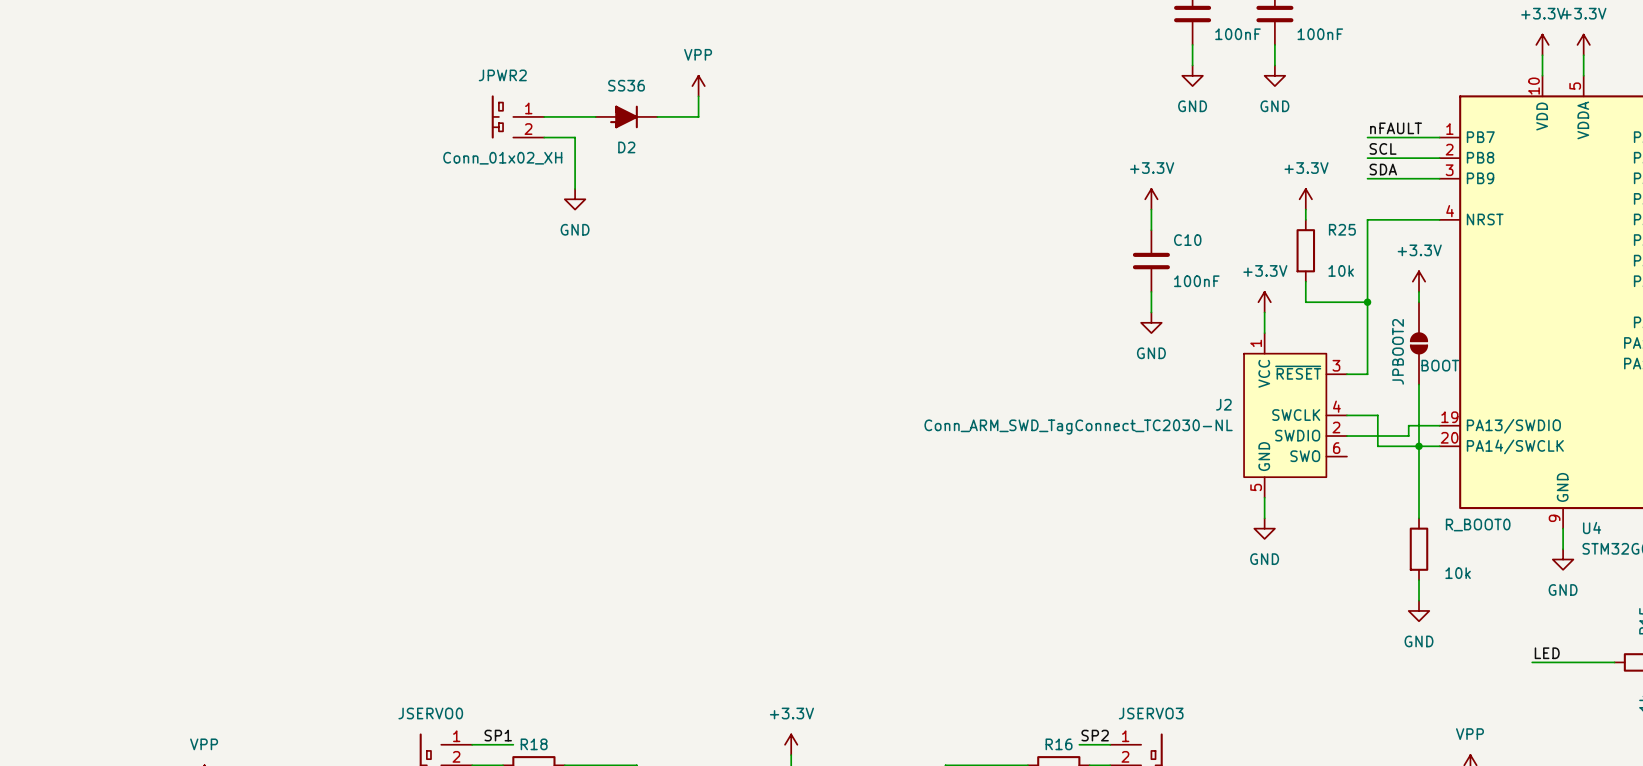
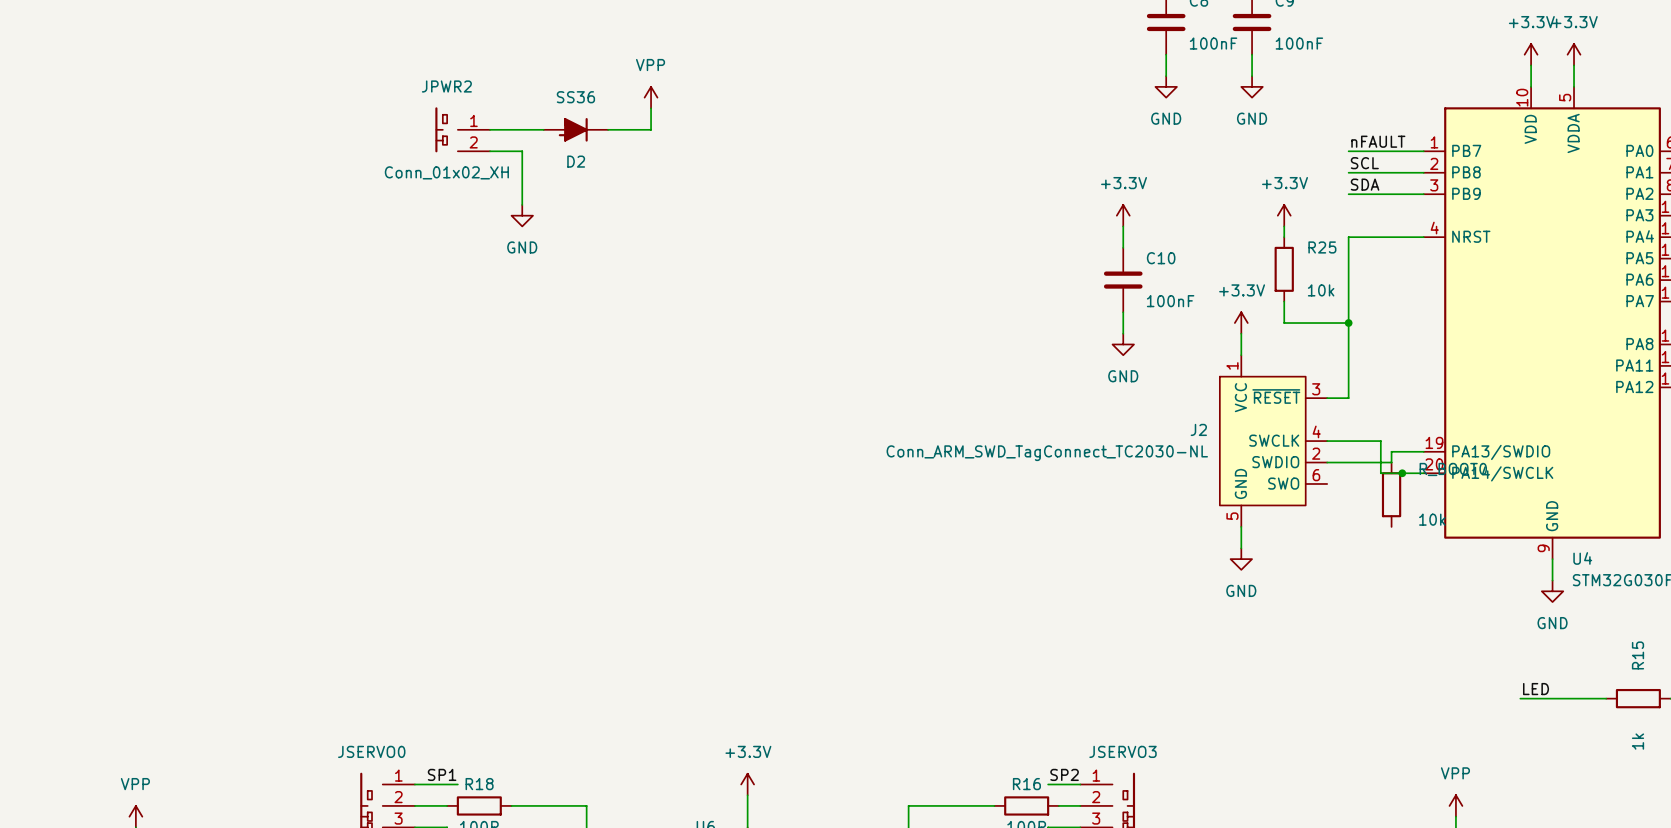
power symbol: +3.3V (1419, 281) -> none
wire: (1419, 291) (1419, 302) -> none
JPBOOT2: BOOT (1419, 343) -> none
wire: (1419, 384) (1419, 518) -> none
wire: (1377, 415) (1377, 446) (1398, 446) -> (1359, 441) (1380, 441) (1380, 473)
R_BOOT0 position: (1419, 549) -> (1391, 494)
wire: (1419, 580) (1419, 600) -> none
power symbol: GND (1419, 610) -> none

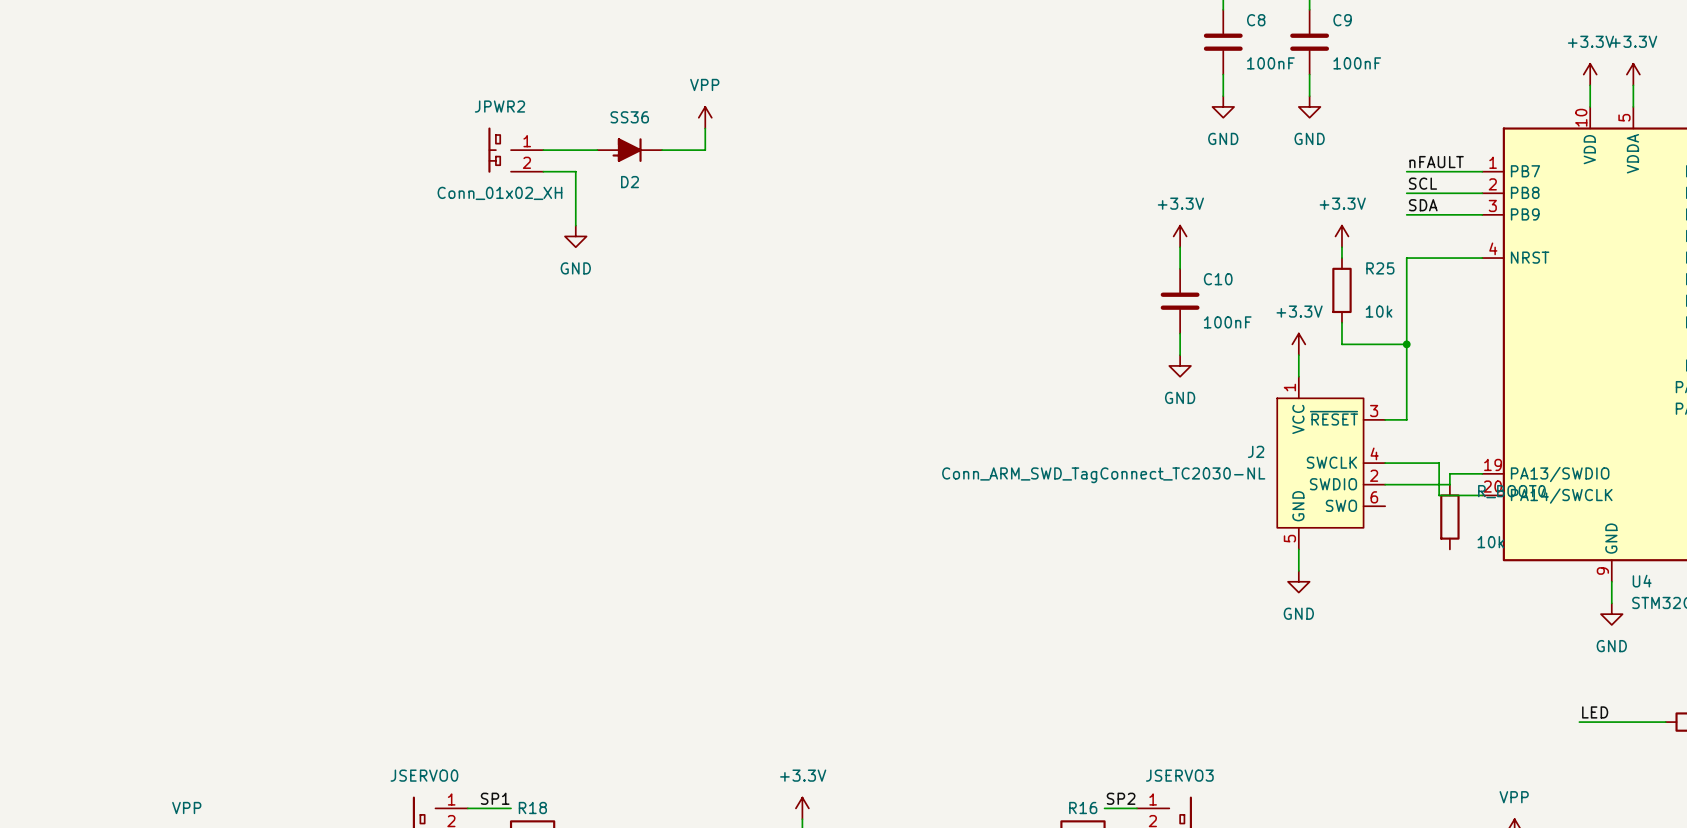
junction: (1402, 473) -> none

